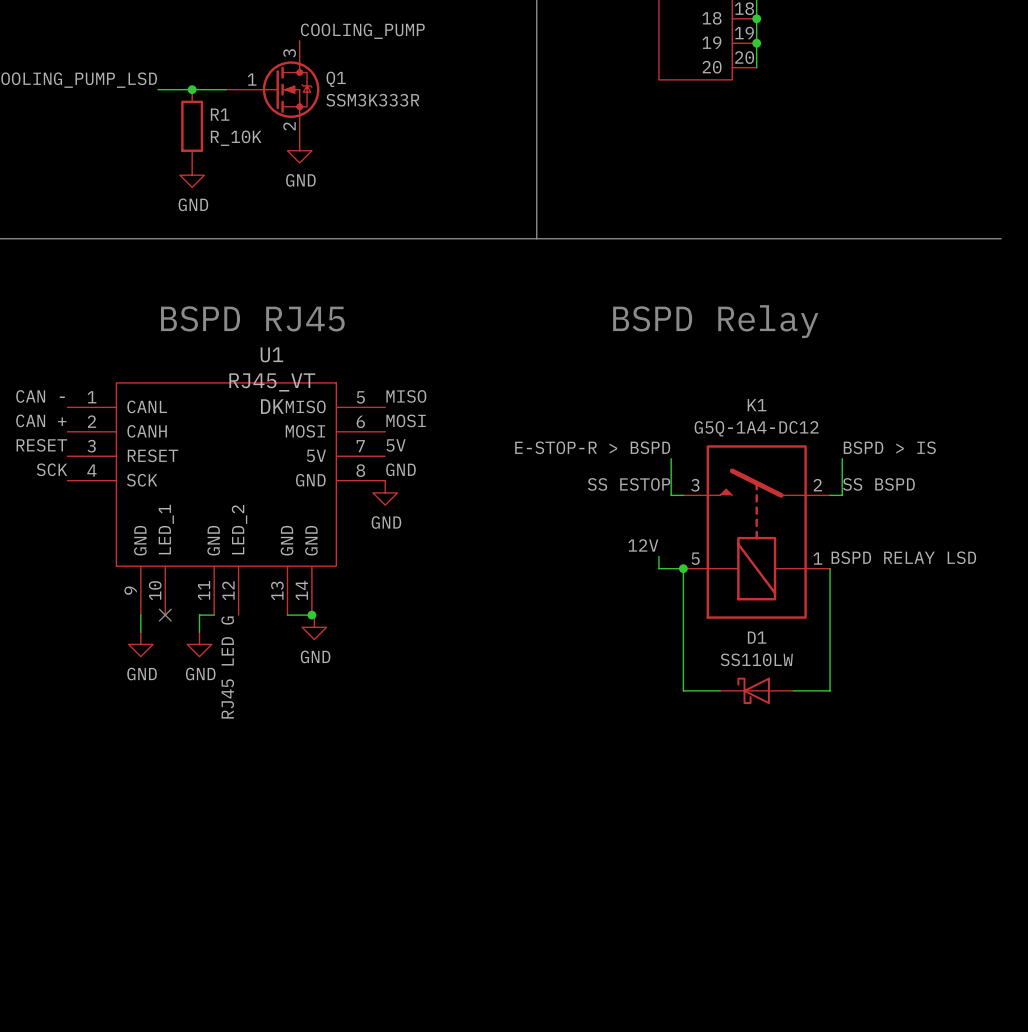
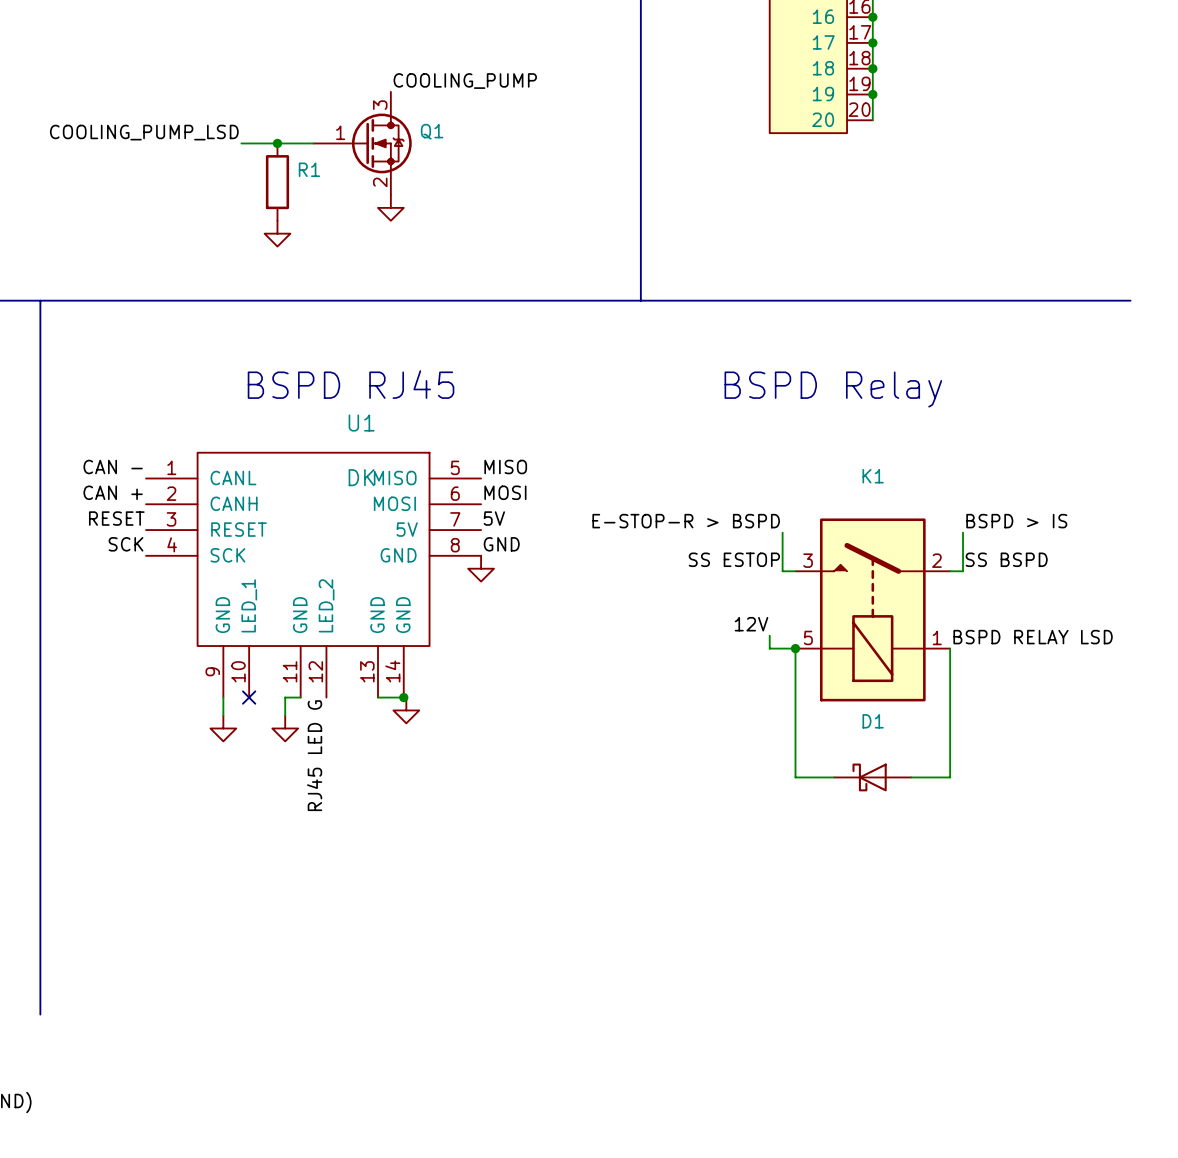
Q1 value: SSM3K333R (372, 100) -> none
R1 value: R_10K (236, 138) -> none
power symbol text: GND (300, 180) -> none
power symbol text: GND (193, 204) -> none
U1 value: RJ45_VT (272, 382) -> none
K1 value: G5Q-1A4-DC12 (756, 428) -> none
power symbol text: GND (386, 522) -> none
power symbol text: GND (315, 656) -> none
D1 value: SS110LW (756, 659) -> none
power symbol text: GND (142, 674) -> none
power symbol text: GND (200, 674) -> none

